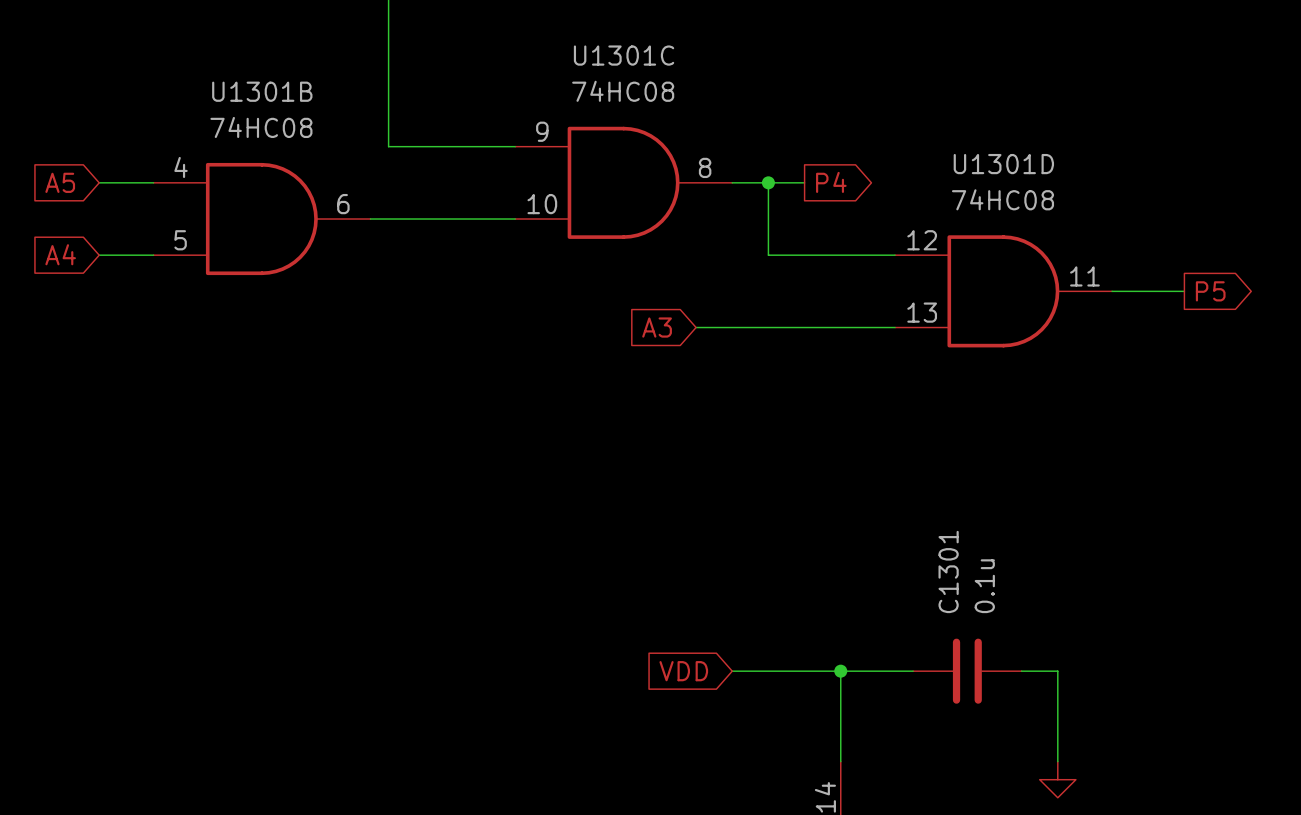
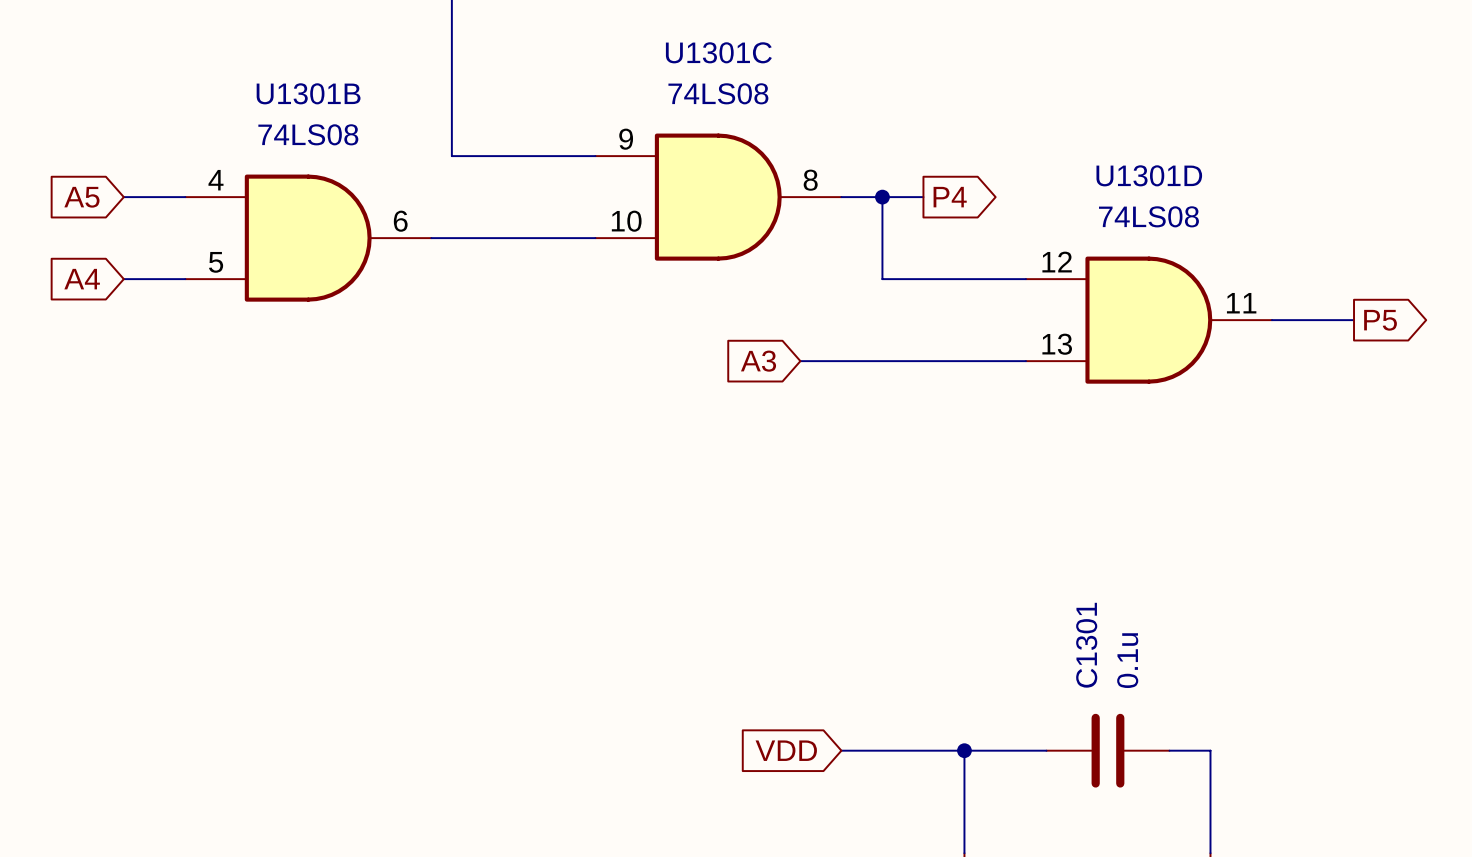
U1301C value: 74HC08 (623, 91) -> 74LS08 (718, 93)
U1301B value: 74HC08 (261, 127) -> 74LS08 (308, 134)
U1301D value: 74HC08 (1003, 199) -> 74LS08 (1148, 216)

